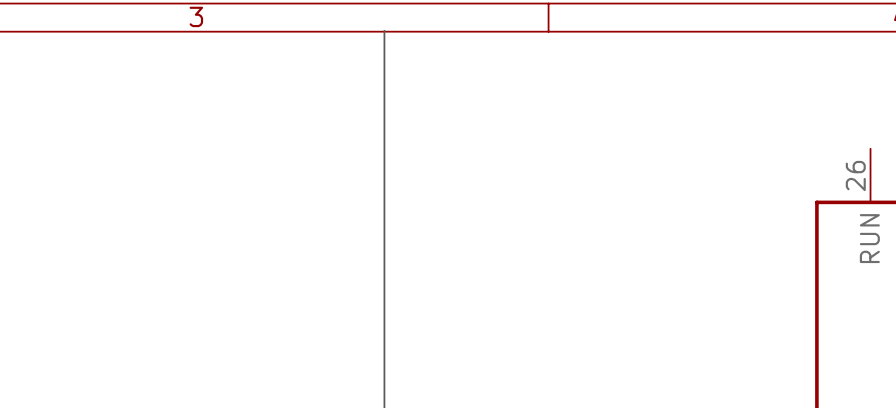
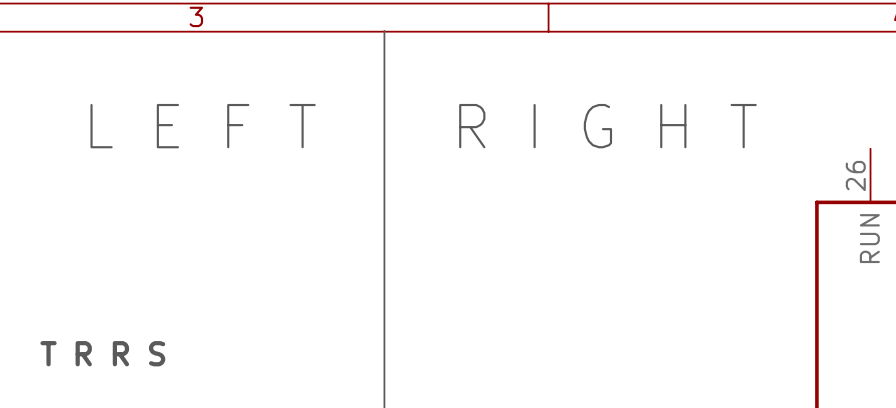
text: none -> L E F T (203, 126)
text: none -> R I G H T (607, 126)
text: none -> T R R S (102, 353)

